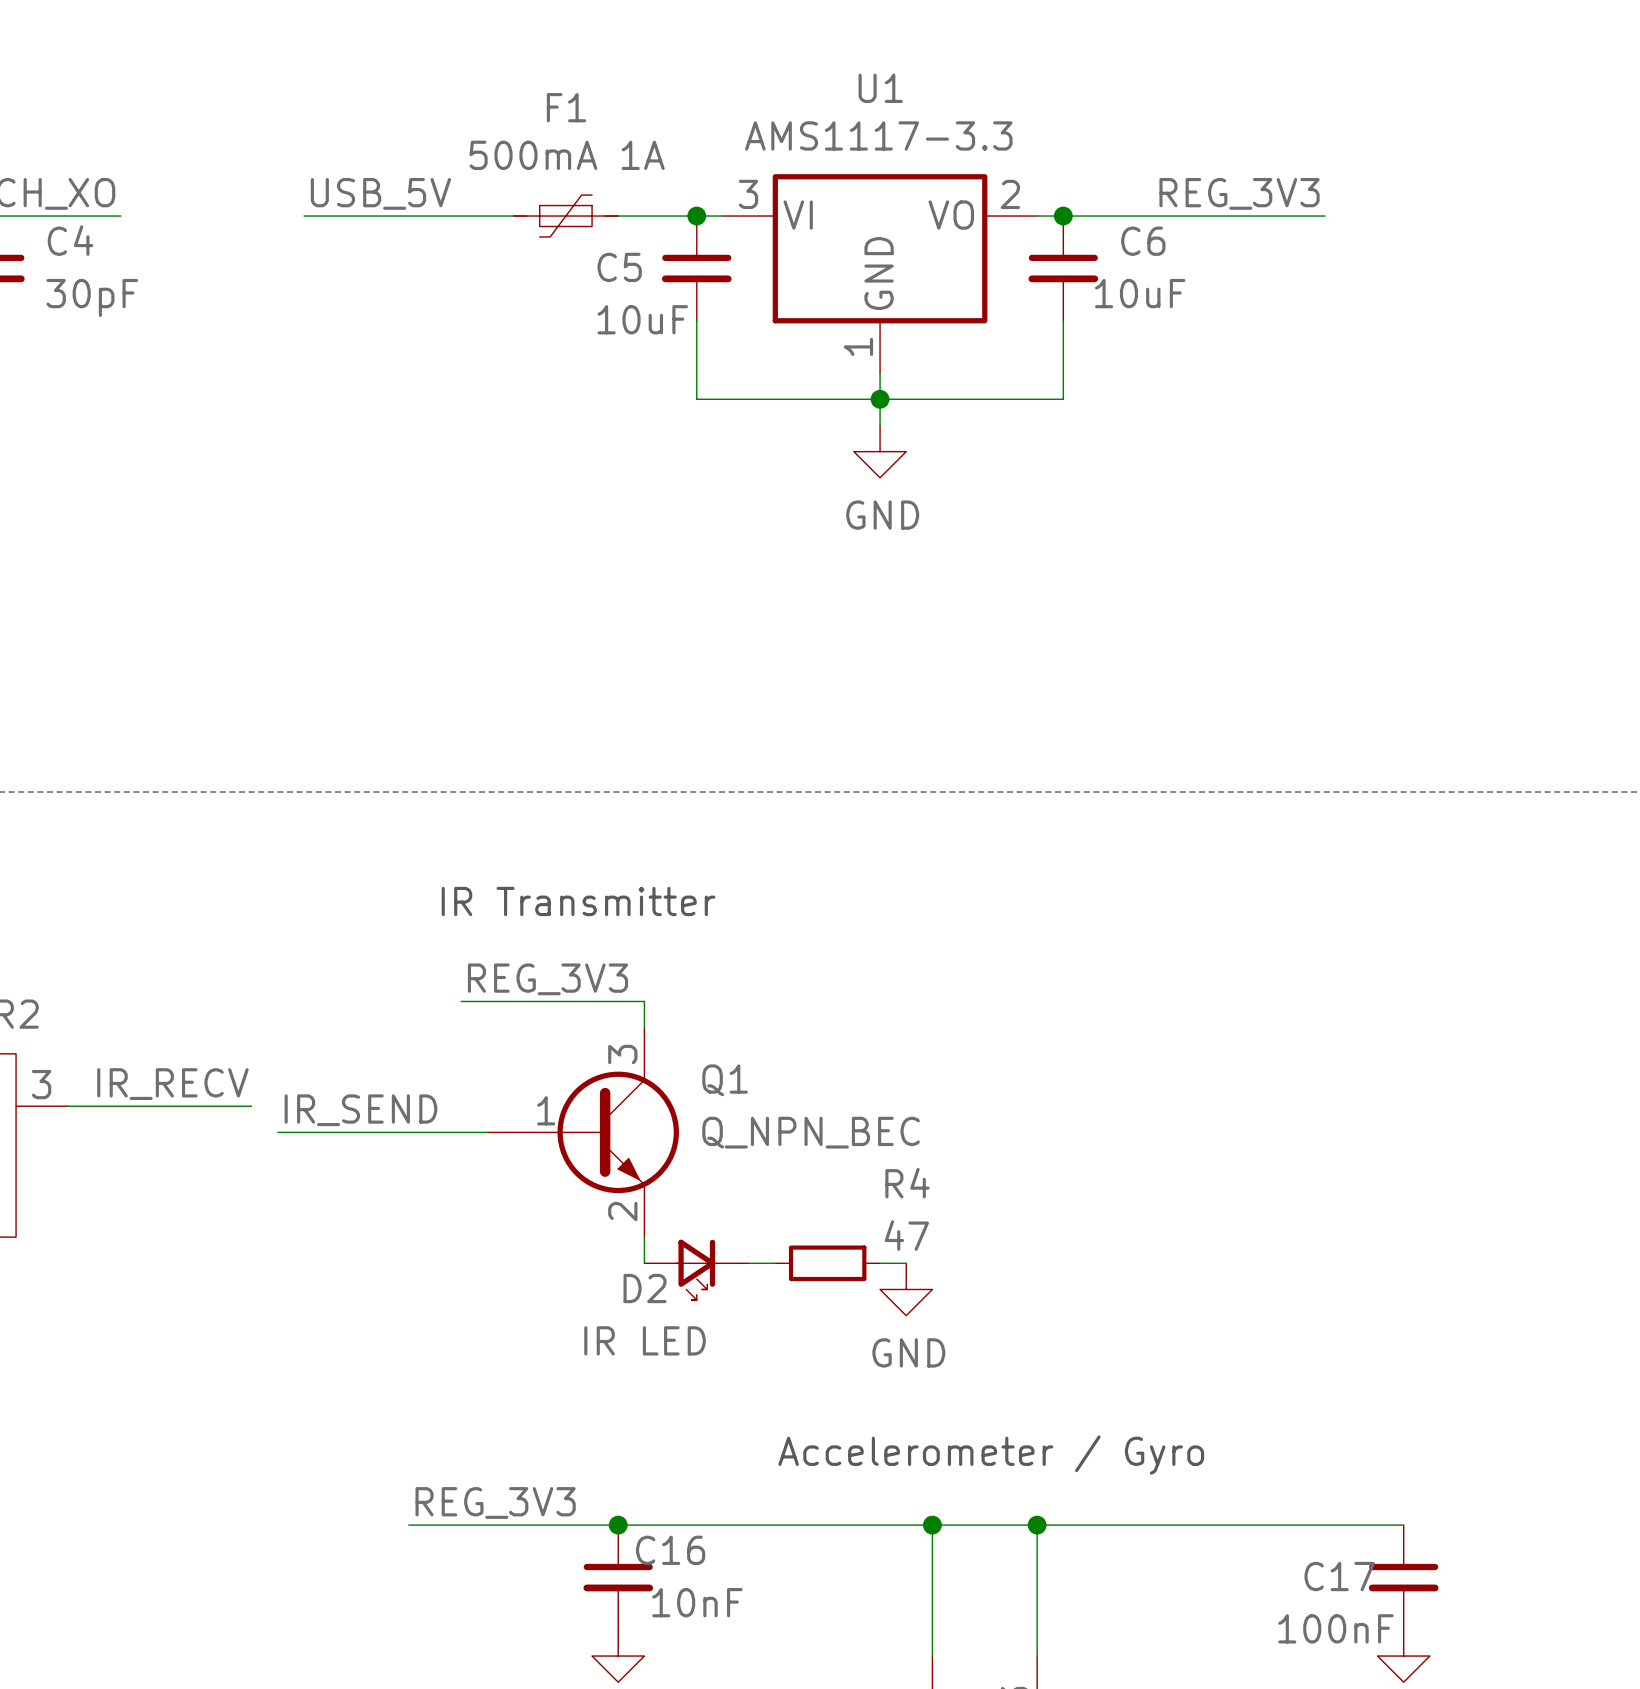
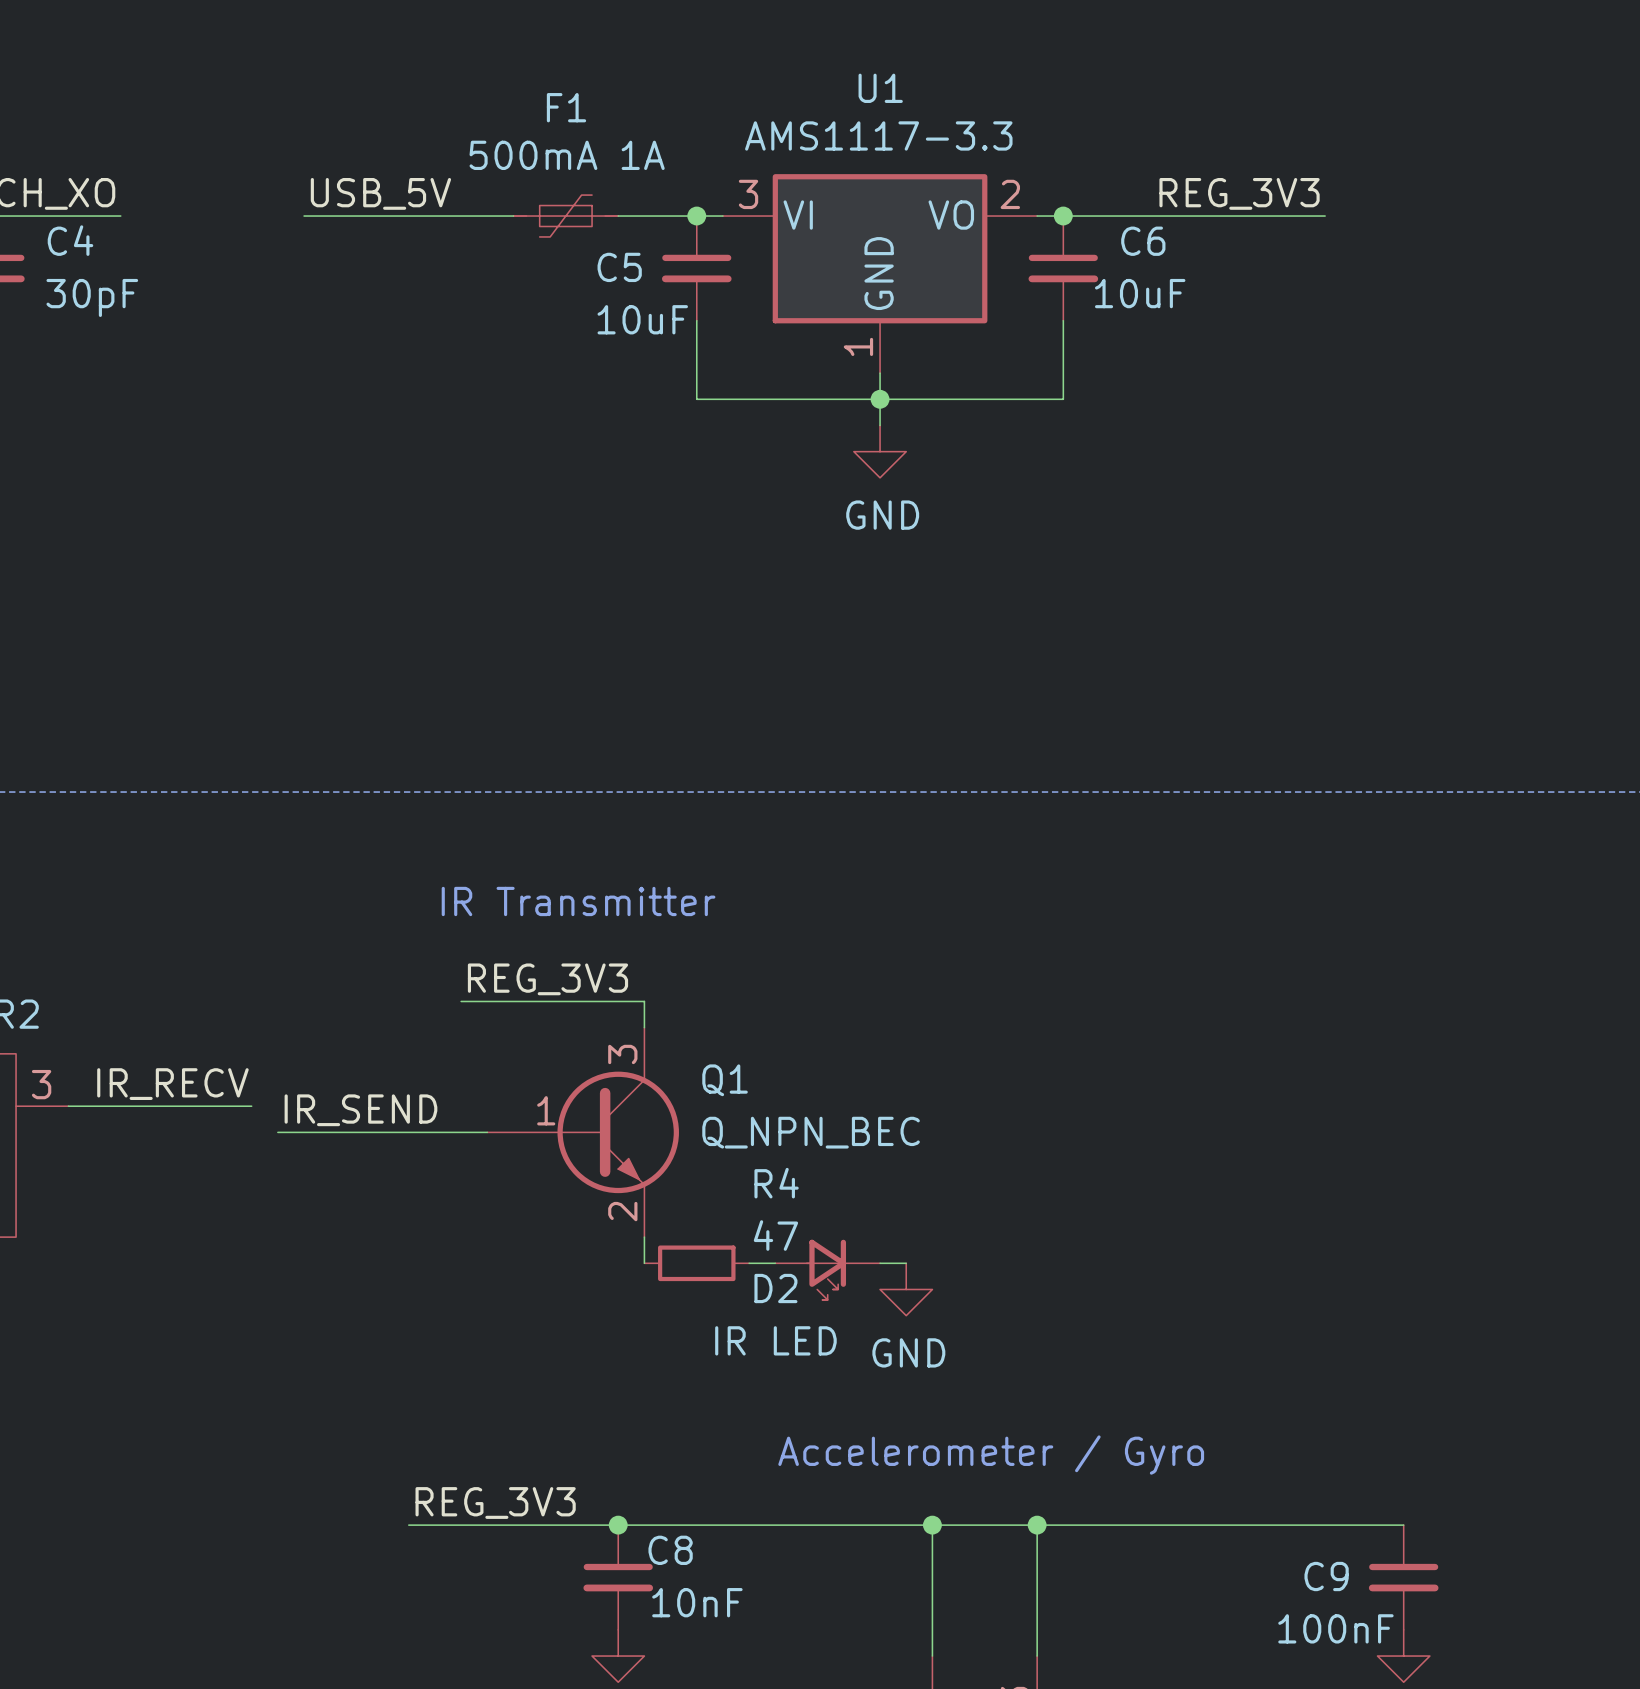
R4 position: (827, 1263) -> (696, 1263)
D2 position: (696, 1269) -> (827, 1269)
C16 name: C16 (670, 1550) -> C8 (670, 1550)
C17 name: C17 (1339, 1576) -> C9 (1326, 1576)

